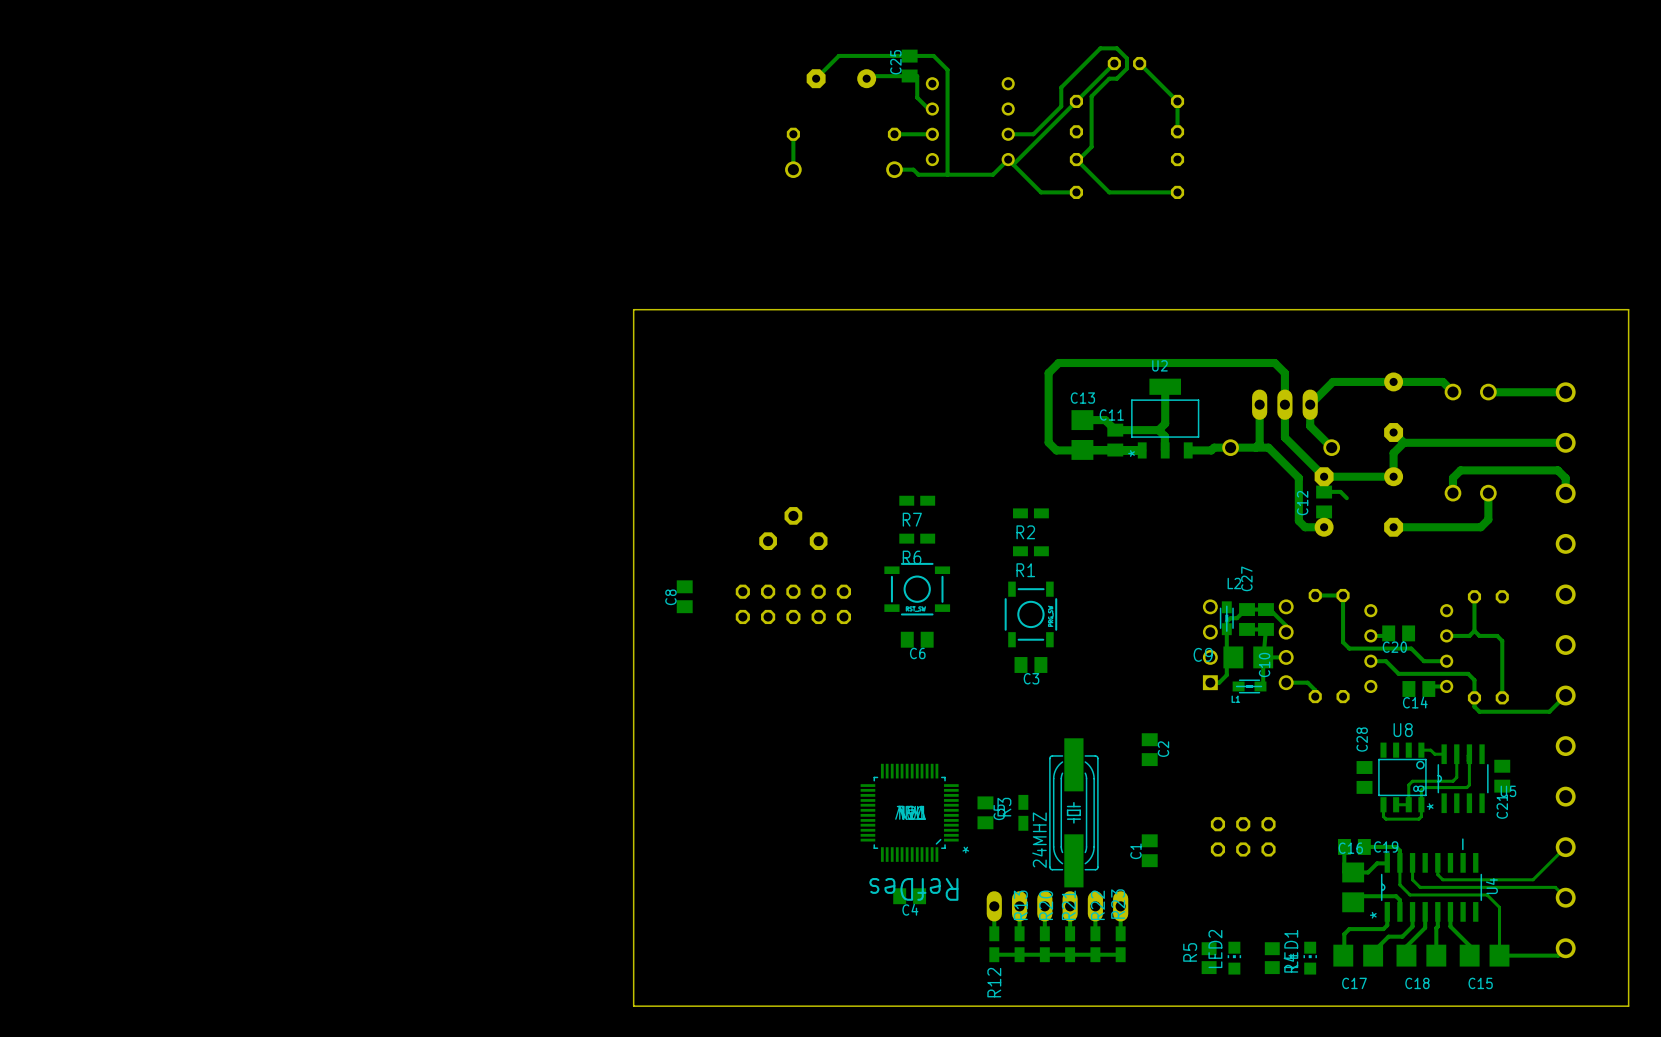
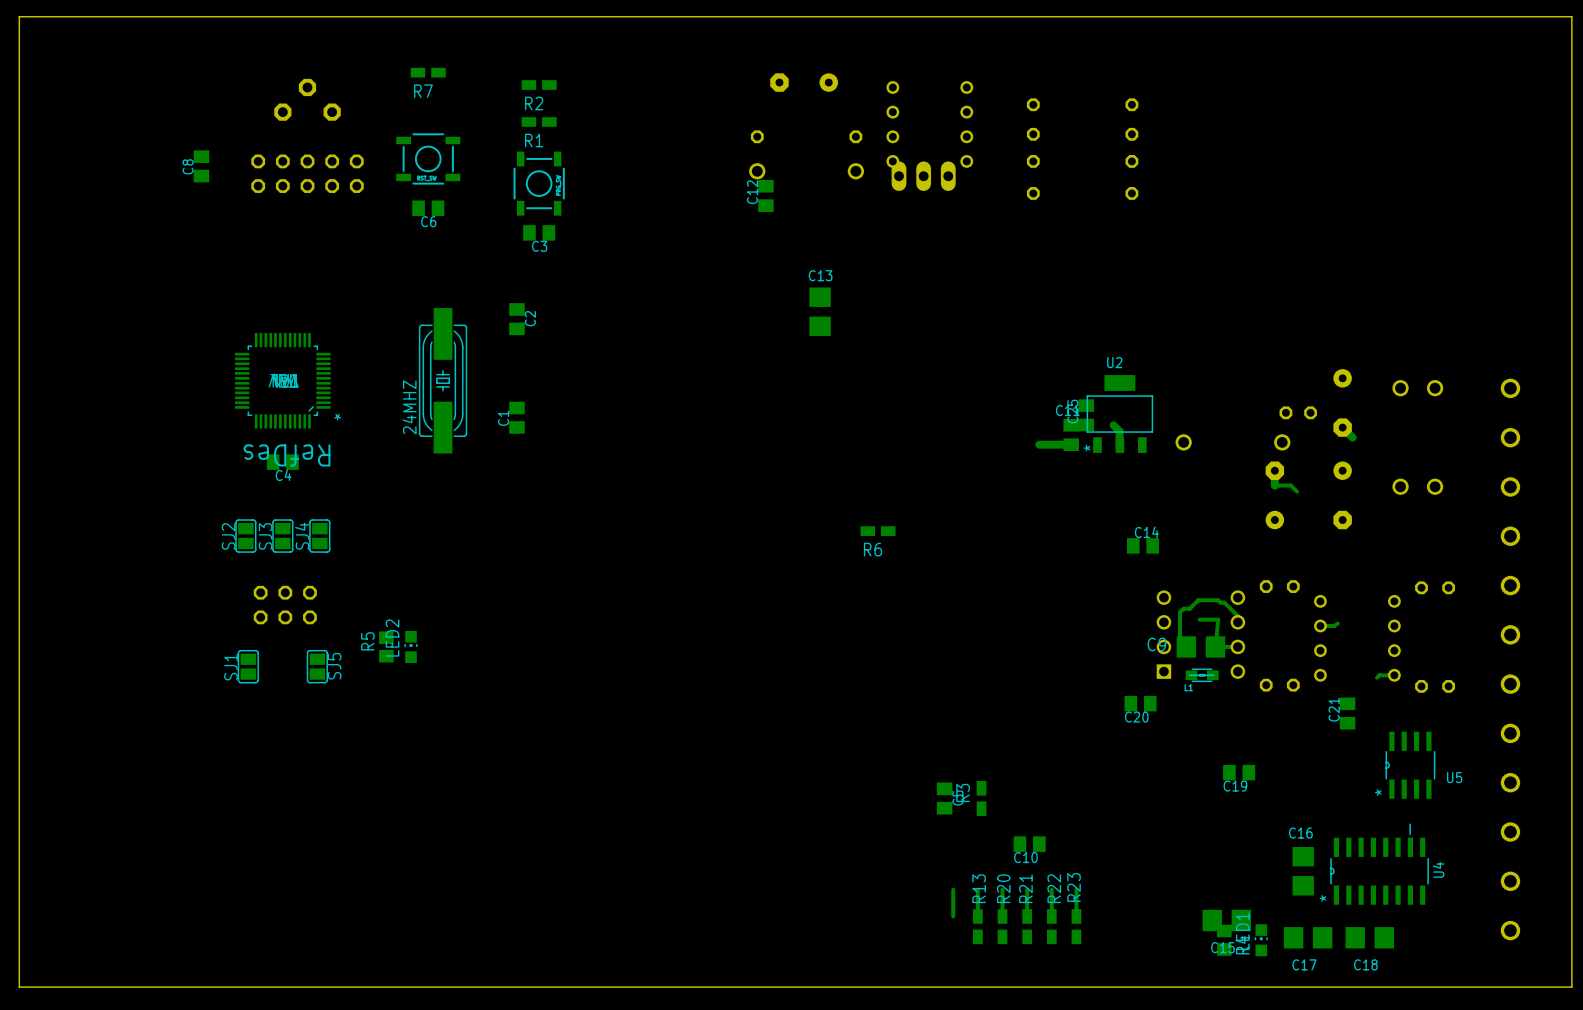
bottom track: (909, 55) (838, 55) (816, 78) -> none
bottom track: (909, 56) (933, 55) (947, 69) (947, 174) -> none
bottom track: (1114, 63) (1013, 164) -> none
part: (1126, 63) -> none
bottom track: (1139, 63) (1177, 101) (1177, 131) -> none
C25 position: (909, 66) -> (1086, 415)
bottom track: (909, 75) (917, 76) (917, 97) (928, 109) (932, 109) -> none
bottom track: (909, 76) (869, 76) (866, 78) -> none
part: none -> (307, 99)
bottom track: (793, 134) (793, 169) -> none
bottom track: (932, 134) (894, 134) -> none
bottom track: (1008, 134) (1033, 134) (1061, 106) (1061, 87) (1100, 48) (1116, 48) (1126, 58) (1126, 68) (1116, 78) (1109, 78) (1091, 96) (1091, 146) (1078, 159) (1076, 159) (1109, 192) (1177, 192) -> none
part: none -> (428, 158)
bottom track: (894, 169) (913, 169) (918, 174) (993, 174) (1008, 159) (1041, 192) (1076, 192) -> none
part: none -> (307, 173)
part: none -> (923, 176)
part: none -> (539, 183)
board edge: (1628, 309) (633, 309) (633, 1006) -> (1571, 307) (1571, 16) (19, 16) (19, 987) (601, 987)
part: none -> (282, 380)
bottom track: (1165, 386) (1165, 423) (1158, 430) (1115, 430) (1105, 420) (1082, 420) -> none
bottom track: (1452, 392) (1442, 381) (1332, 381) (1310, 404) (1310, 426) (1331, 447) -> none
bottom track: (1488, 392) (1565, 392) -> none
bottom track: (1259, 404) (1259, 443) (1255, 447) -> none
part: (1284, 404) -> none
part: none -> (1298, 412)
C13 position: (1082, 435) -> (820, 311)
bottom track: (1565, 442) (1403, 442) (1393, 453) (1393, 476) (1324, 476) (1284, 437) (1284, 373) (1274, 362) (1058, 362) (1048, 373) (1048, 442) (1056, 450) (1142, 450) (1142, 453) -> none
bottom track: (1188, 450) (1211, 450) (1214, 447) (1268, 447) (1298, 477) (1298, 520) (1305, 527) (1324, 527) (1324, 511) -> none
bottom track: (1452, 493) (1452, 477) (1460, 470) (1557, 470) (1565, 478) (1565, 493) -> none
bottom track: (1488, 493) (1488, 519) (1480, 527) (1393, 527) -> none
R7 position: (917, 500) -> (428, 72)
C12 position: (1324, 501) -> (765, 195)
C12 name position: C12 (1302, 503) -> C12 (752, 192)
R2 position: (1030, 513) -> (539, 85)
part: (793, 528) -> none
SJ2: none -> (245, 536)
SJ3: none -> (282, 536)
SJ4: none -> (319, 536)
R1 position: (1030, 551) -> (539, 121)
part: (917, 589) -> none
bottom track: (1315, 595) (1343, 595) (1343, 642) (1349, 648) (1411, 648) (1423, 661) (1446, 661) -> none
C8 position: (684, 596) -> (201, 166)
bottom track: (1474, 596) (1474, 630) -> none
part: (793, 604) -> none
part: none -> (285, 605)
part: (1030, 614) -> none
L2: (1226, 618) -> none
C27: (1247, 619) -> none
C10 rotation: 0° (1265, 619) -> 90° clockwise (1029, 844)
C10 position: (1265, 619) -> (1029, 844)
bottom track: (1474, 630) (1479, 635) (1497, 635) (1502, 640) (1502, 697) -> none
bottom track: (1474, 630) (1469, 635) (1446, 635) -> none
C20 position: (1398, 633) -> (1140, 703)
C6 position: (917, 639) -> (428, 208)
bottom track: (1229, 653) (1226, 656) (1226, 675) (1219, 682) (1210, 682) -> none
bottom track: (1263, 657) (1263, 683) (1260, 686) -> none
bottom track: (1370, 661) (1386, 661) (1398, 673) (1468, 673) (1474, 680) (1474, 706) (1479, 711) (1549, 711) (1565, 695) -> none
C3 position: (1030, 664) -> (539, 232)
C10 name position: C10 (1264, 665) -> C10 (1025, 857)
SJ1: none -> (248, 666)
SJ5: none -> (317, 666)
bottom track: (1286, 682) (1307, 682) (1315, 690) (1315, 696) -> none
C14 position: (1418, 689) -> (1143, 545)
C14 name position: C14 (1415, 702) -> C14 (1146, 532)
C2 position: (1149, 749) -> (516, 319)
bottom track: (1421, 750) (1430, 750) (1434, 754) (1444, 754) -> none
bottom track: (1456, 754) (1456, 777) (1452, 781) (1412, 781) (1408, 785) (1408, 804) (1396, 804) -> none
bottom track: (1469, 754) (1469, 785) (1466, 787) (1423, 787) (1421, 790) (1421, 816) (1418, 819) (1386, 819) (1383, 816) (1383, 804) -> none
C21 position: (1502, 776) -> (1347, 713)
C28: (1364, 777) -> none
U8: (1402, 777) -> none
C21 name position: C21 (1502, 806) -> C21 (1334, 709)
part: (909, 812) -> none
24MHZ position: (1073, 812) -> (443, 380)
part: (1243, 836) -> none
bottom track: (1344, 846) (1344, 872) (1368, 872) (1377, 863) (1387, 862) -> none
C19 position: (1354, 846) -> (1239, 772)
bottom track: (1364, 846) (1396, 846) (1399, 850) (1399, 884) (1410, 894) (1487, 894) (1499, 907) (1499, 955) (1558, 955) (1565, 948) -> none
C19 name position: C19 (1386, 846) -> C19 (1235, 786)
bottom track: (1565, 847) (1533, 879) (1442, 879) (1437, 874) (1437, 862) -> none
C1 position: (1149, 850) -> (516, 417)
bottom track: (1412, 862) (1412, 879) (1420, 887) (1555, 887) (1565, 897) -> none
C4 position: (909, 896) -> (282, 462)
bottom track: (1353, 902) (1359, 896) (1396, 896) (1399, 900) (1399, 911) -> none
part: (1057, 906) -> none
bottom track: (1387, 911) (1387, 925) (1383, 929) (1349, 929) (1344, 934) (1343, 955) -> none
bottom track: (1412, 911) (1412, 926) (1402, 936) (1388, 936) (1373, 952) (1373, 955) -> none
bottom track: (1425, 911) (1425, 927) (1406, 946) (1406, 955) -> none
bottom track: (1437, 911) (1436, 955) -> none
bottom track: (1450, 911) (1450, 926) (1469, 945) (1469, 955) -> none
R12: (994, 944) -> none
bottom track: (1120, 954) (994, 954) -> none
C15 position: (1484, 955) -> (1226, 920)
R5 position: (1209, 958) -> (386, 646)
LED2 position: (1234, 958) -> (411, 646)

